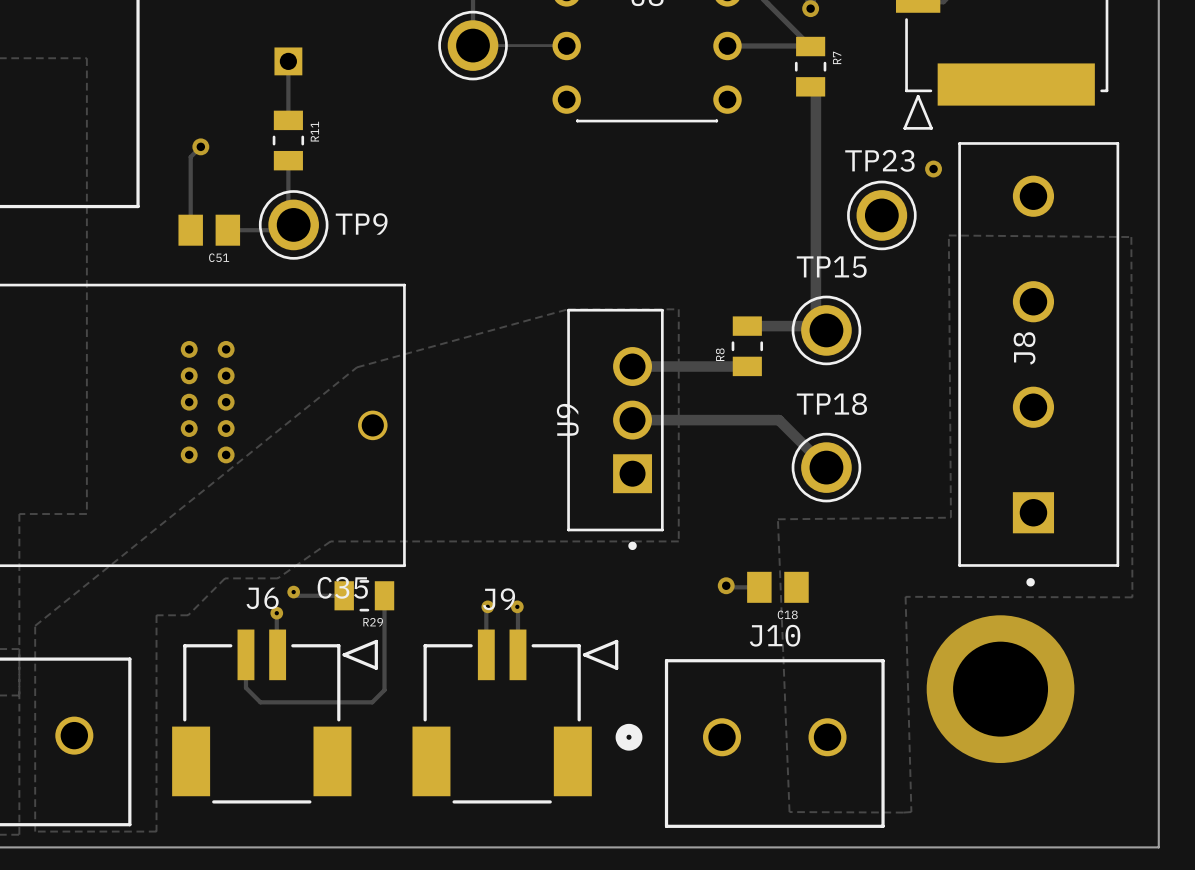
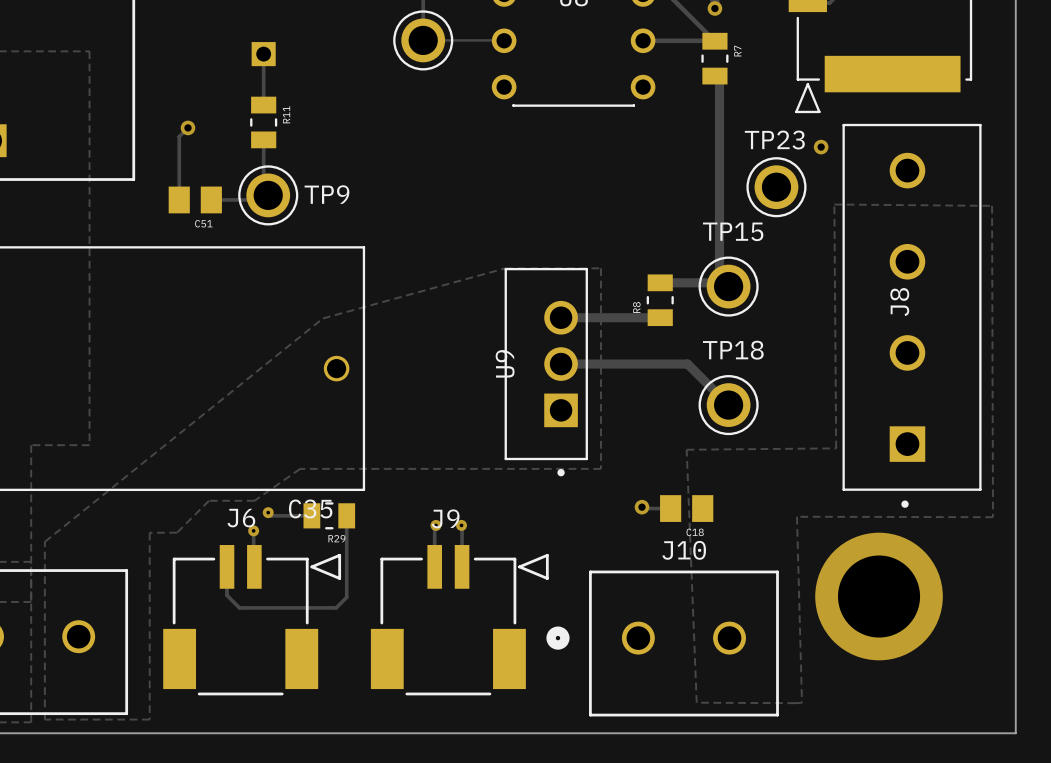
via: (189, 349) -> none
via: (226, 349) -> none
via: (189, 375) -> none
via: (226, 375) -> none
via: (189, 402) -> none
via: (226, 402) -> none
via: (189, 428) -> none
via: (226, 428) -> none
via: (189, 454) -> none
via: (226, 454) -> none

